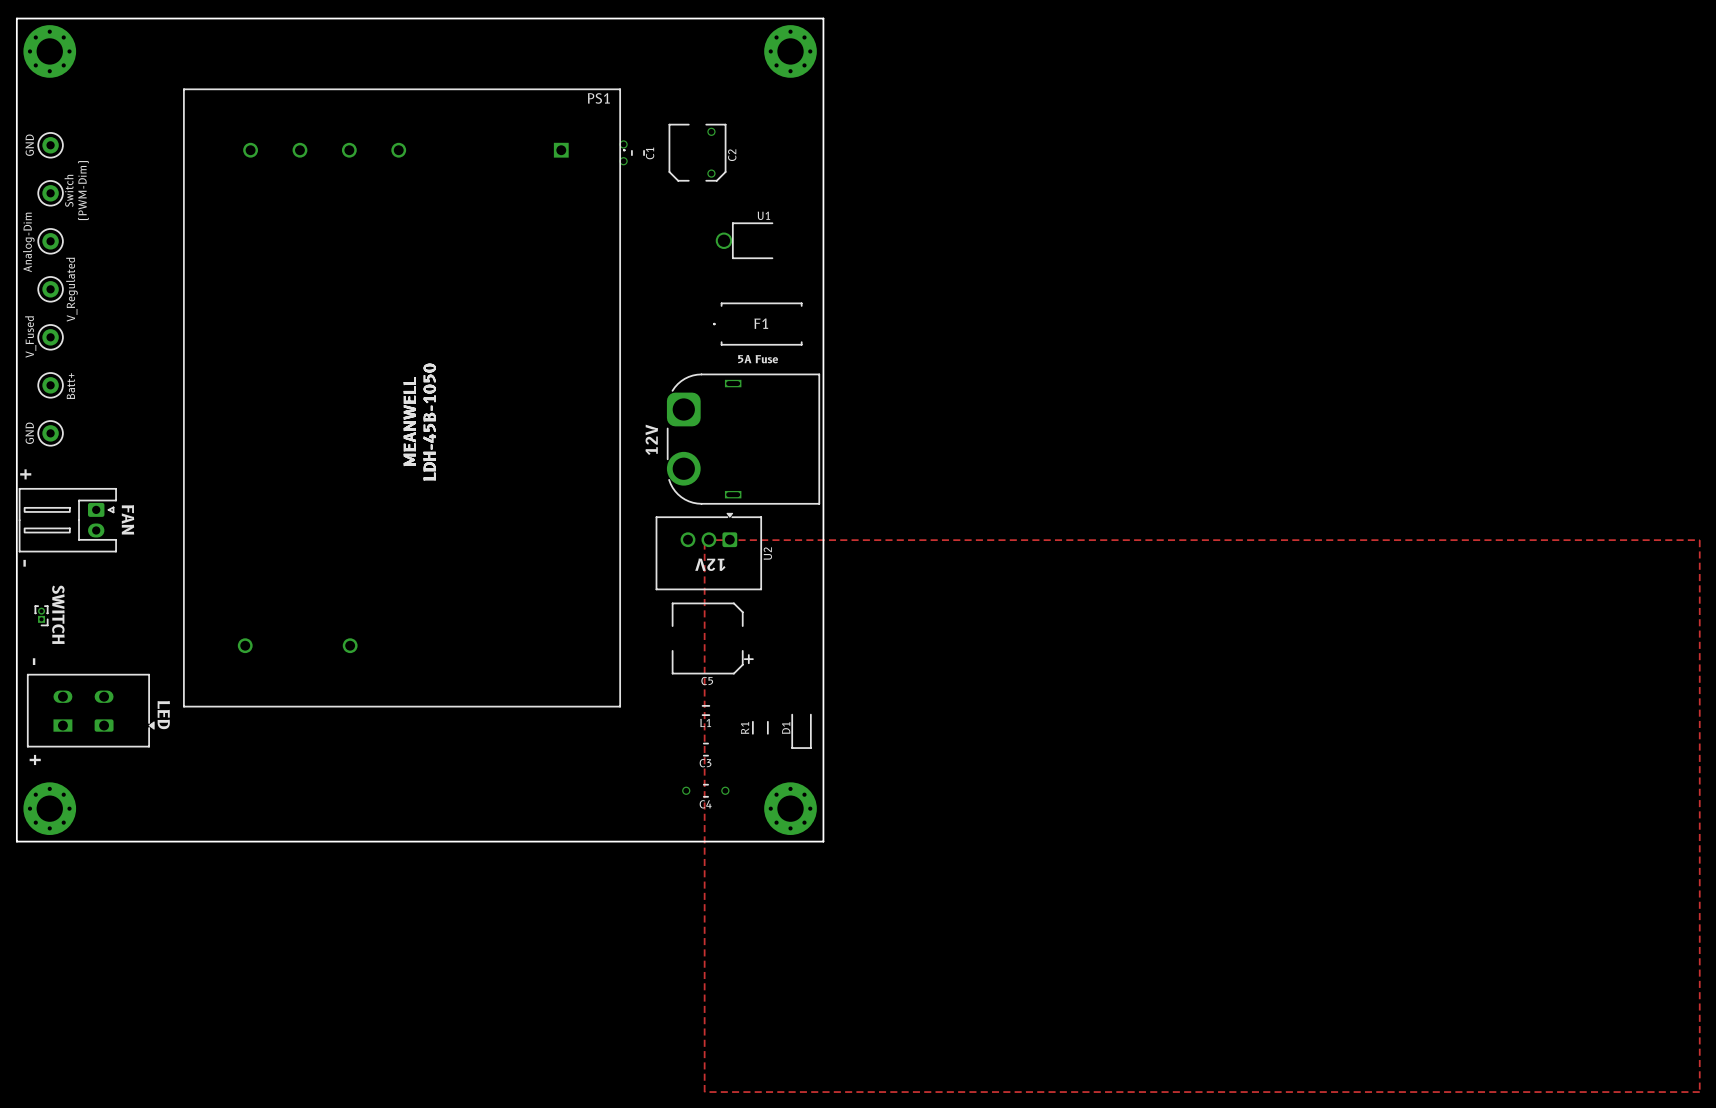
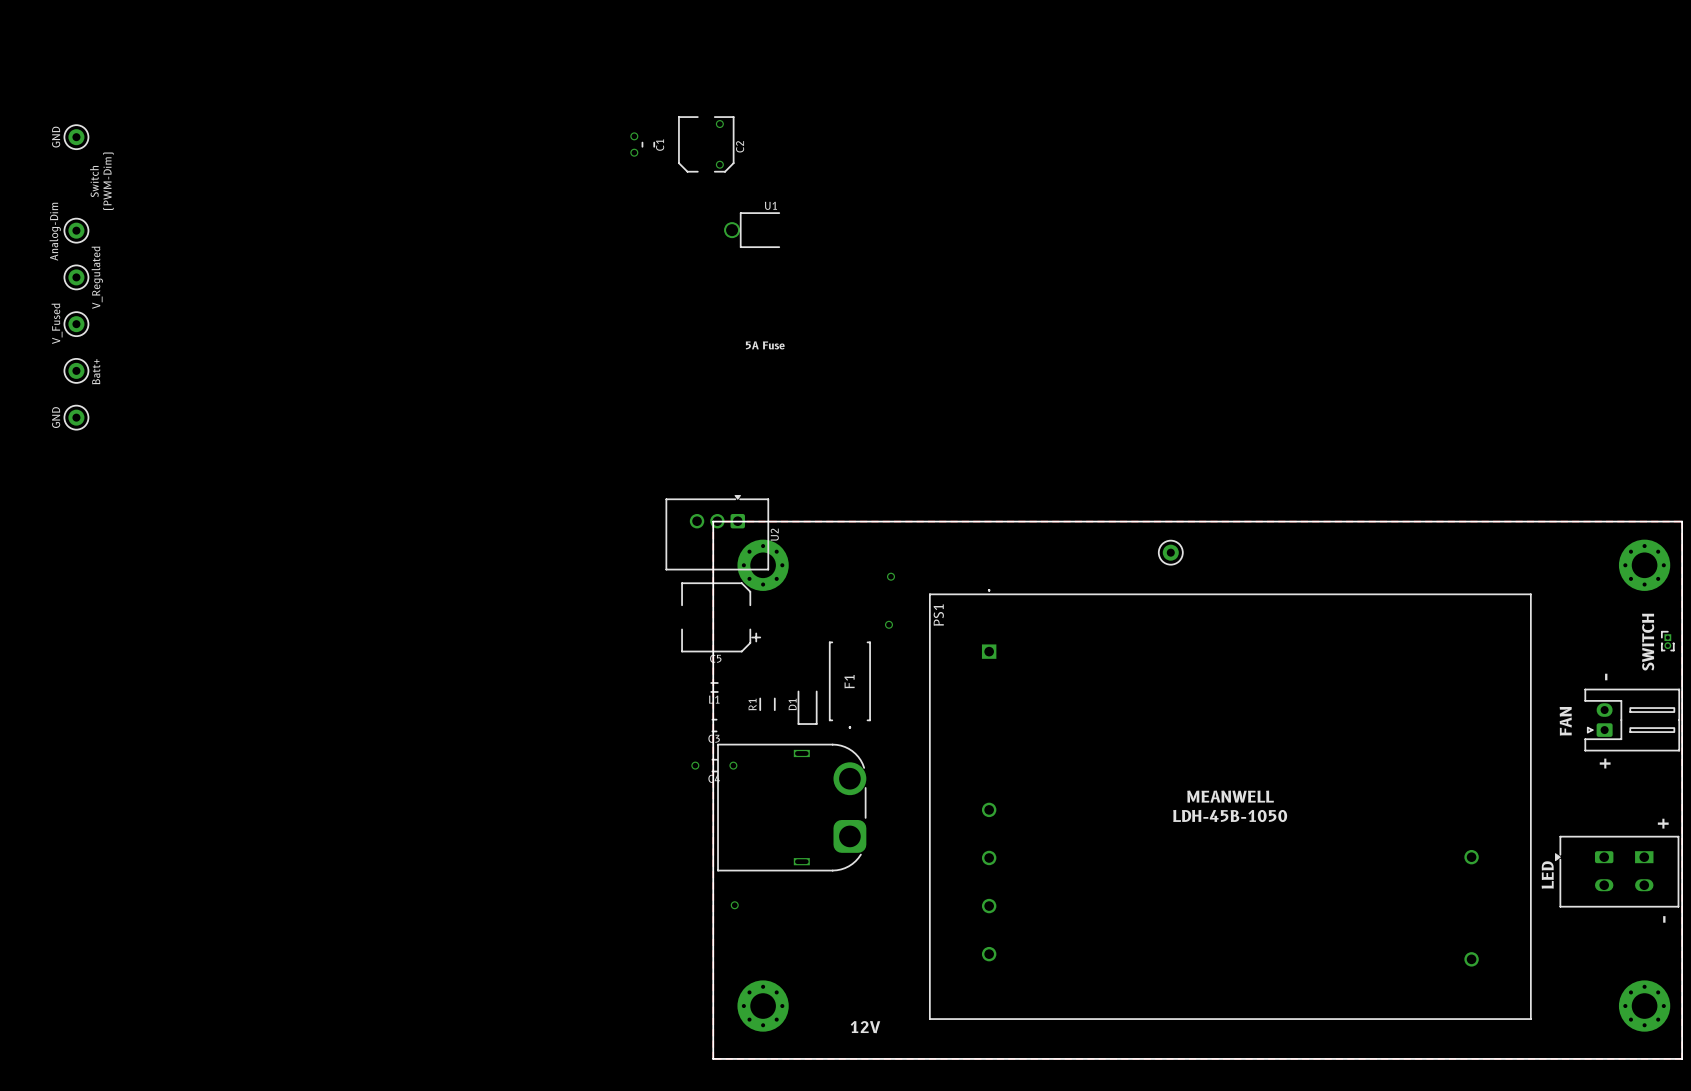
board edge: (16, 18) (823, 18) (823, 841) (16, 841) (16, 18) -> none
part: (49, 51) -> none
part: (790, 51) -> none
part: (50, 193) -> none
F1 rotation: 0° (757, 324) -> 90° counterclockwise (849, 684)
F1 position: (757, 324) -> (849, 684)
PS1 rotation: 0° (404, 397) -> 90° counterclockwise (1230, 804)
PS1 position: (404, 397) -> (1230, 804)
text: MEANWELL (409, 421) -> none
text: LDH-45B-1050 (429, 422) -> none
text: 12V (651, 439) -> none
part: (743, 439) -> none
text: + (25, 474) -> none
text: FAN (128, 519) -> none
part: (67, 520) -> none
board edge: none -> (713, 521) (1682, 521) (1682, 1058) (713, 1058) (713, 521)
text: - (24, 563) -> none
text: 12V (710, 564) -> none
part: none -> (1170, 552)
part: none -> (763, 565)
part: none -> (1644, 565)
via: none -> (891, 576)
text: SWITCH (58, 614) -> none
part: (41, 615) -> none
via: none -> (889, 624)
text: - (34, 661) -> none
part: none -> (1667, 641)
text: none -> SWITCH (1648, 642)
text: none -> - (1606, 677)
part: (90, 710) -> none
text: LED (163, 715) -> none
part: none -> (1632, 720)
text: none -> FAN (1565, 721)
text: + (35, 759) -> none
text: none -> + (1605, 763)
part: (49, 808) -> none
part: (790, 808) -> none
text: none -> MEANWELL (1230, 796)
part: none -> (791, 807)
text: none -> LDH-45B-1050 (1230, 815)
text: none -> + (1663, 823)
part: none -> (1616, 871)
text: none -> LED (1547, 874)
via: none -> (734, 905)
text: none -> - (1664, 919)
part: none -> (763, 1006)
part: none -> (1644, 1006)
text: none -> 12V (865, 1027)

